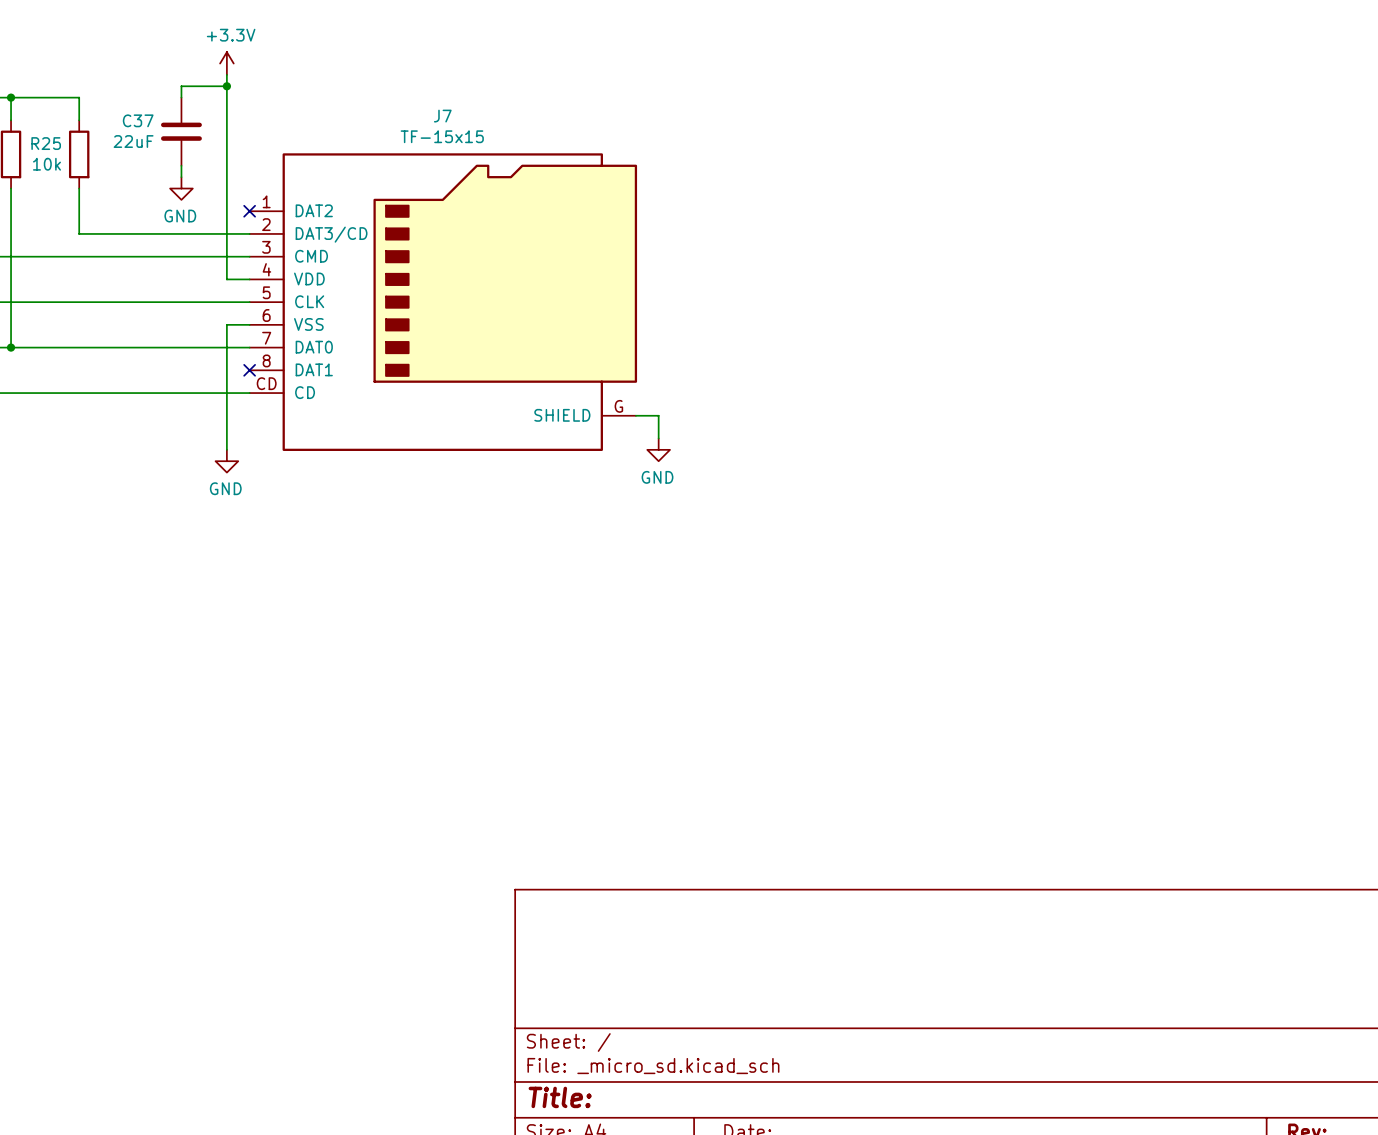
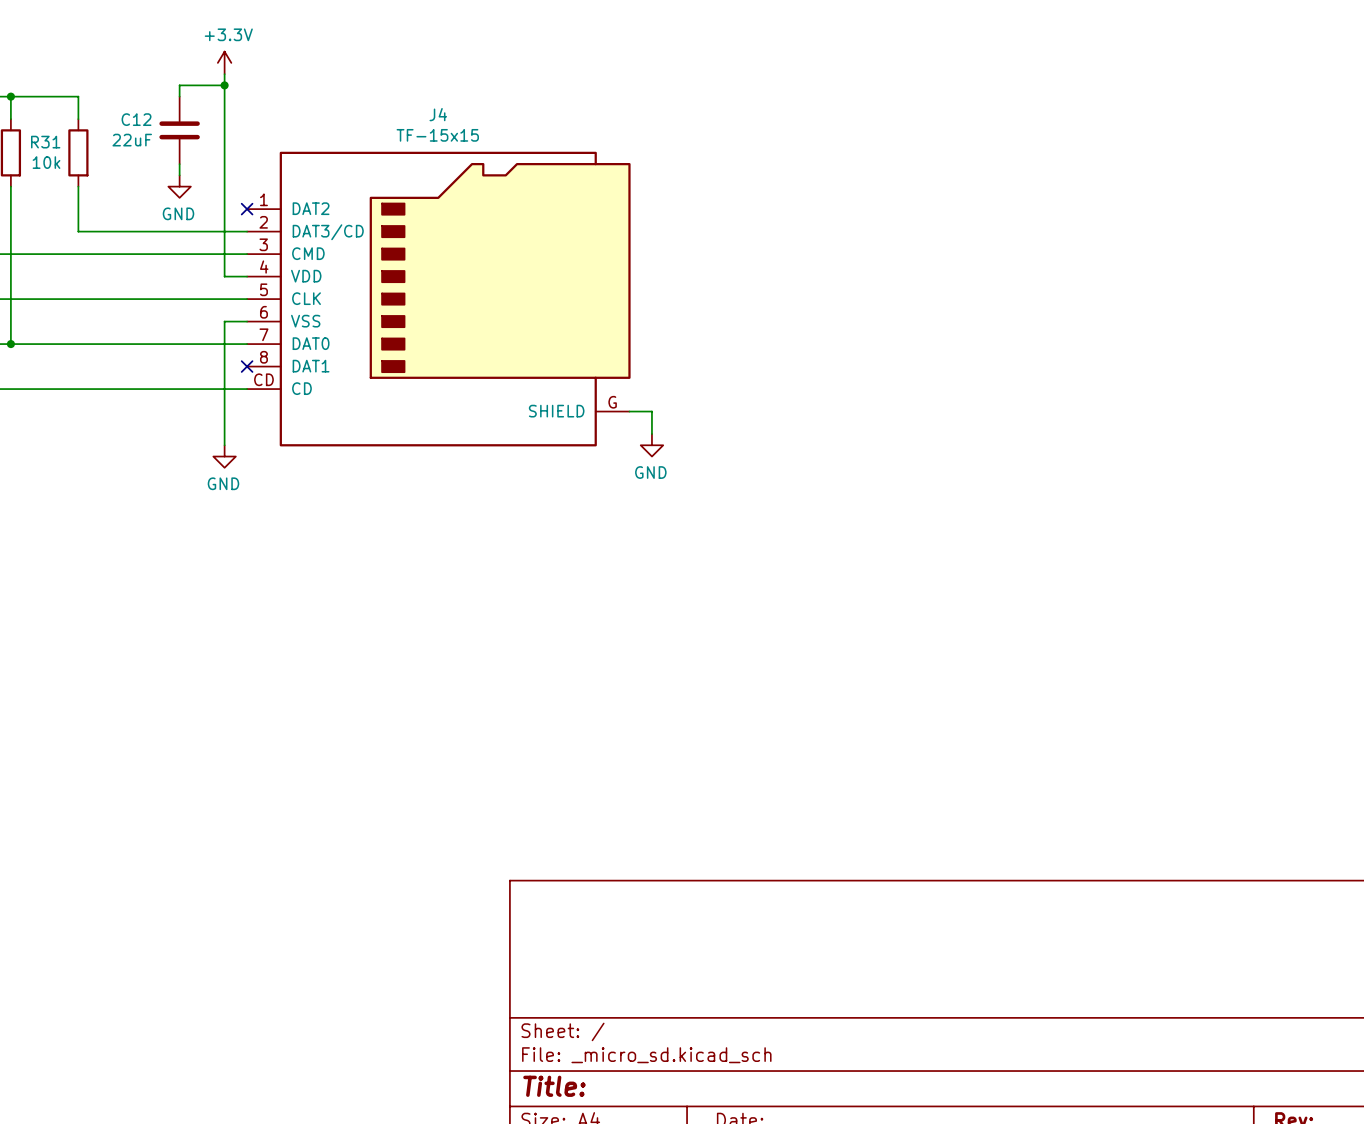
J7 name: J7 (442, 116) -> J4 (438, 114)
C37 name: C37 (138, 120) -> C12 (136, 119)
R25 name: R25 (46, 143) -> R31 (45, 142)

